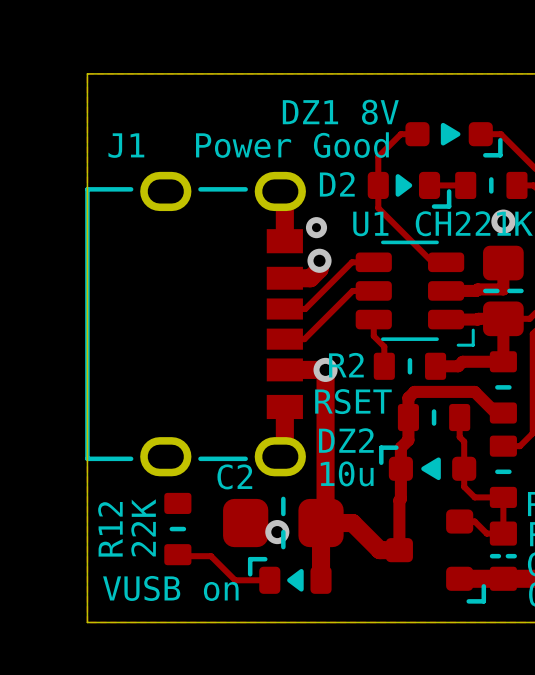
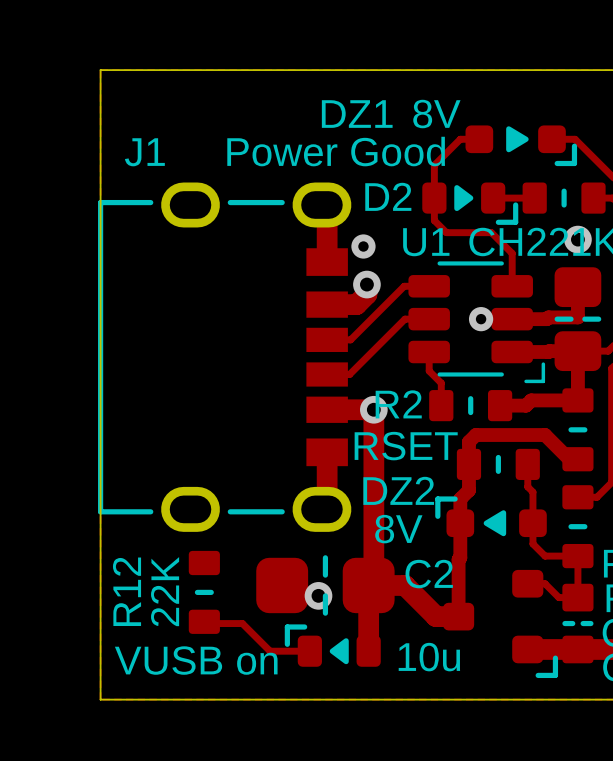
track: (378, 205) (378, 208) (432, 262) (446, 262) -> (434, 220) (446, 232) (491, 232) (512, 253) (512, 286)
via: none -> (481, 319)
DZ2 value: none -> 8V (398, 529)
C2 value position: 10u (347, 473) -> 10u (429, 657)
C2 name position: C2 (234, 476) -> C2 (429, 574)

